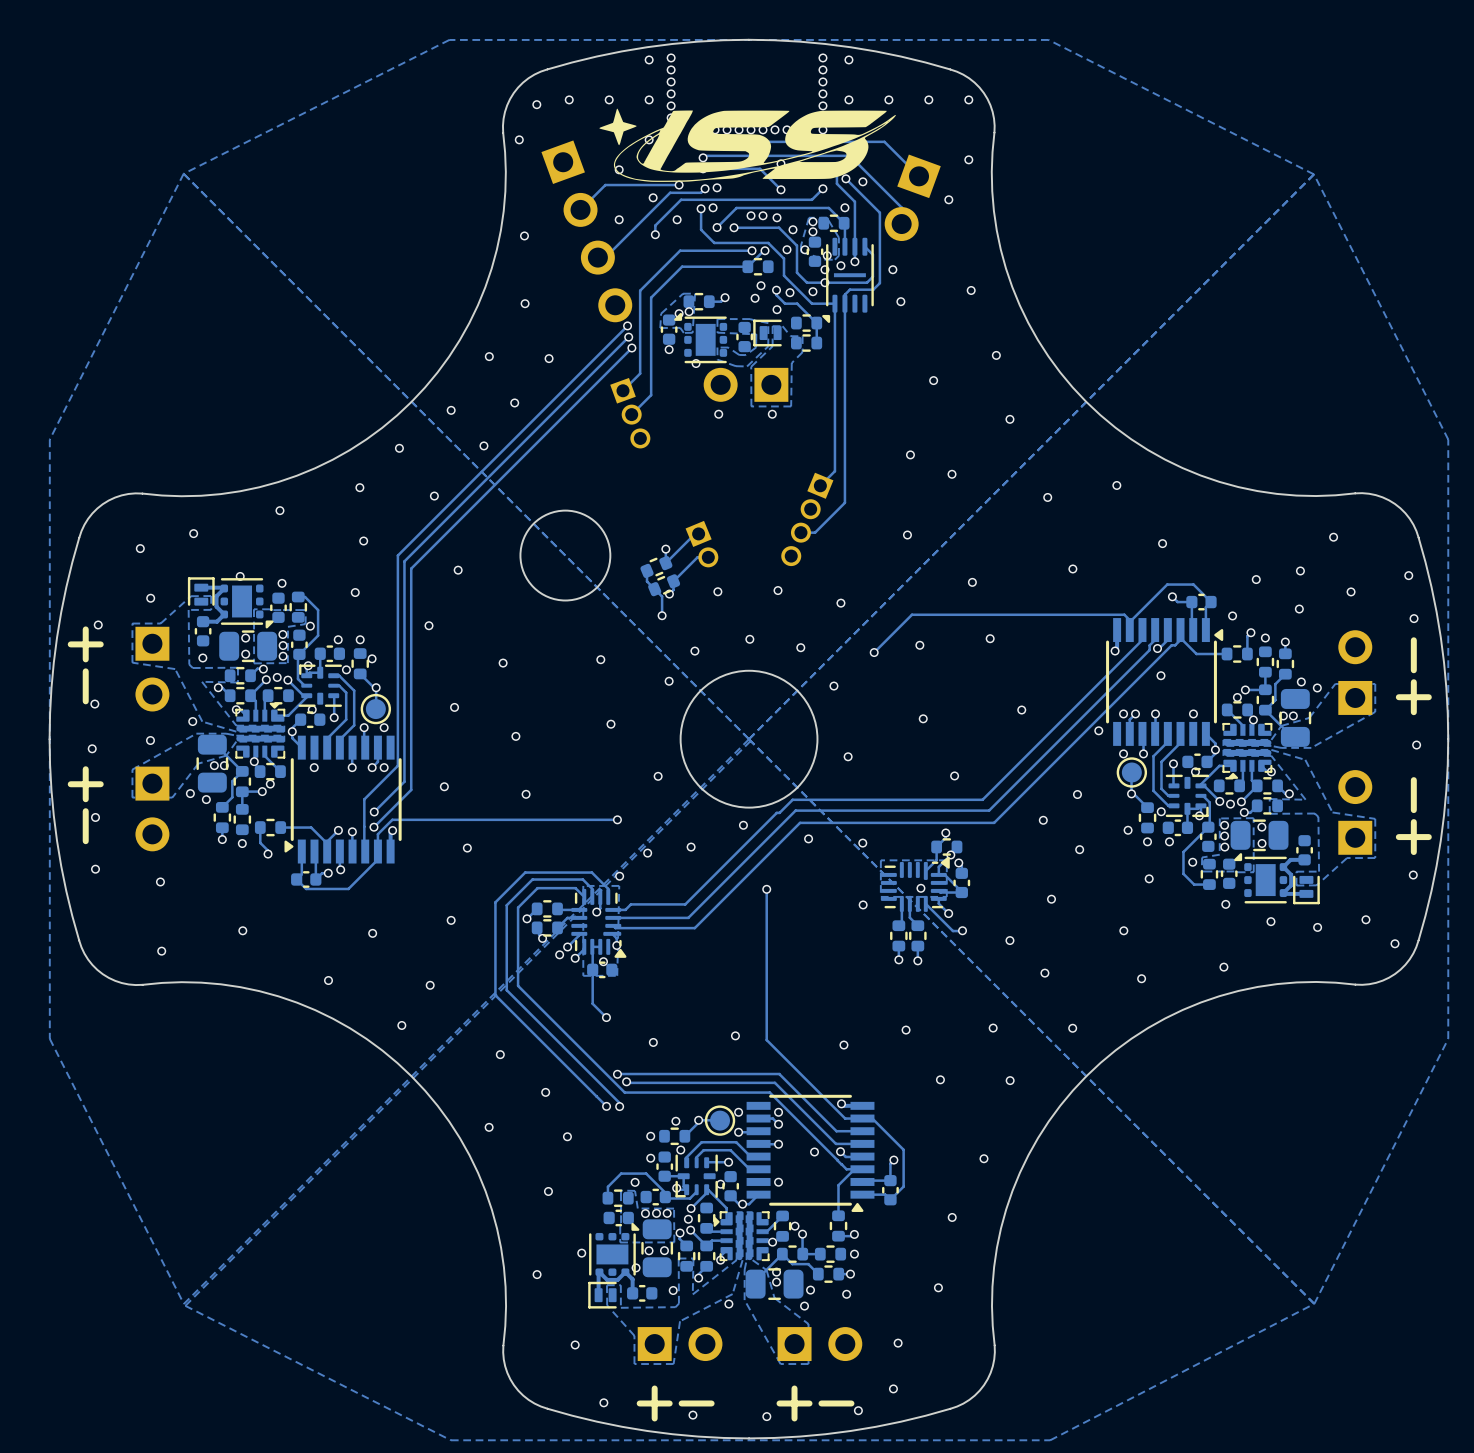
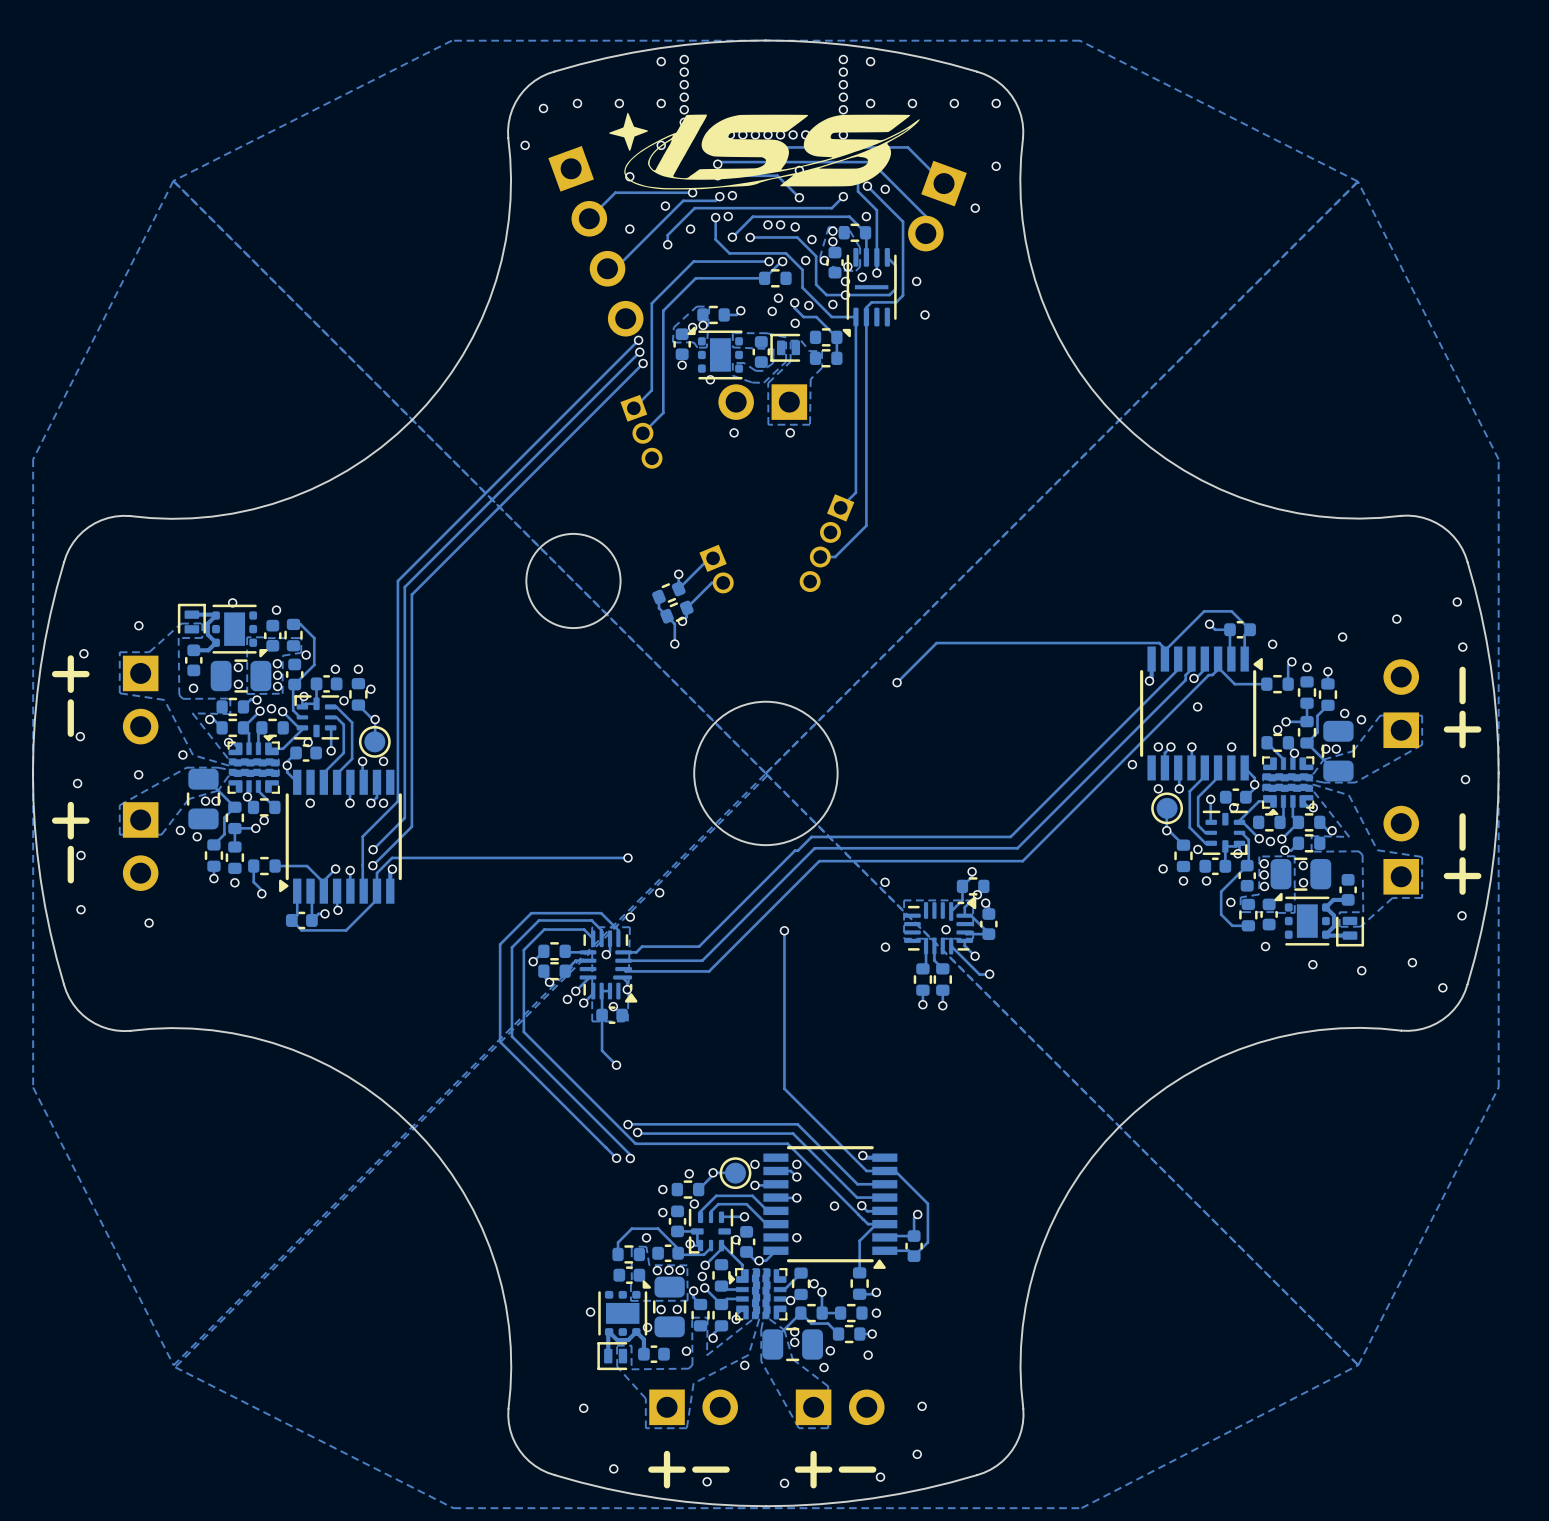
via: (524, 235) -> none
via: (971, 290) -> none
via: (525, 303) -> none
via: (996, 355) -> none
via: (489, 356) -> none
via: (549, 358) -> none
via: (933, 380) -> none
via: (514, 402) -> none
via: (451, 410) -> none
via: (1009, 419) -> none
via: (483, 445) -> none
via: (399, 448) -> none
via: (910, 454) -> none
via: (952, 474) -> none
via: (1116, 485) -> none
via: (359, 487) -> none
via: (434, 496) -> none
via: (1047, 497) -> none
via: (279, 510) -> none
via: (193, 533) -> none
via: (907, 535) -> none
via: (1333, 537) -> none
via: (363, 541) -> none
via: (1162, 543) -> none
via: (140, 548) -> none
via: (1072, 568) -> none
via: (458, 570) -> none
via: (1300, 570) -> none
via: (1256, 579) -> none
via: (972, 582) -> none
via: (778, 590) -> none
via: (717, 591) -> none
via: (355, 592) -> none
via: (840, 603) -> none
via: (428, 625) -> none
via: (990, 638) -> none
via: (749, 639) -> none
via: (919, 645) -> none
via: (800, 647) -> none
via: (694, 651) -> none
via: (600, 659) -> none
via: (503, 663) -> none
via: (669, 681) -> none
via: (833, 686) -> none
via: (454, 707) -> none
via: (1021, 710) -> none
via: (923, 718) -> none
via: (610, 724) -> none
via: (515, 736) -> none
via: (848, 756) -> none
via: (954, 775) -> none
via: (658, 776) -> none
via: (444, 786) -> none
via: (526, 794) -> none
via: (1077, 794) -> none
via: (1043, 820) -> none
via: (743, 825) -> none
via: (808, 838) -> none
via: (691, 847) -> none
via: (467, 848) -> none
via: (1079, 849) -> none
via: (1149, 878) -> none
via: (1051, 899) -> none
via: (451, 920) -> none
via: (242, 930) -> none
via: (1123, 930) -> none
via: (372, 933) -> none
via: (1009, 940) -> none
via: (161, 951) -> none
via: (1223, 967) -> none
via: (1044, 973) -> none
via: (1141, 978) -> none
via: (328, 980) -> none
via: (430, 985) -> none
via: (401, 1025) -> none
via: (993, 1028) -> none
via: (1072, 1028) -> none
via: (906, 1030) -> none
via: (735, 1035) -> none
via: (653, 1042) -> none
via: (843, 1045) -> none
via: (500, 1054) -> none
via: (940, 1079) -> none
via: (1010, 1080) -> none
via: (545, 1092) -> none
via: (489, 1127) -> none
via: (567, 1136) -> none
via: (983, 1158) -> none
via: (548, 1191) -> none
via: (952, 1217) -> none
via: (537, 1274) -> none
via: (938, 1287) -> none

